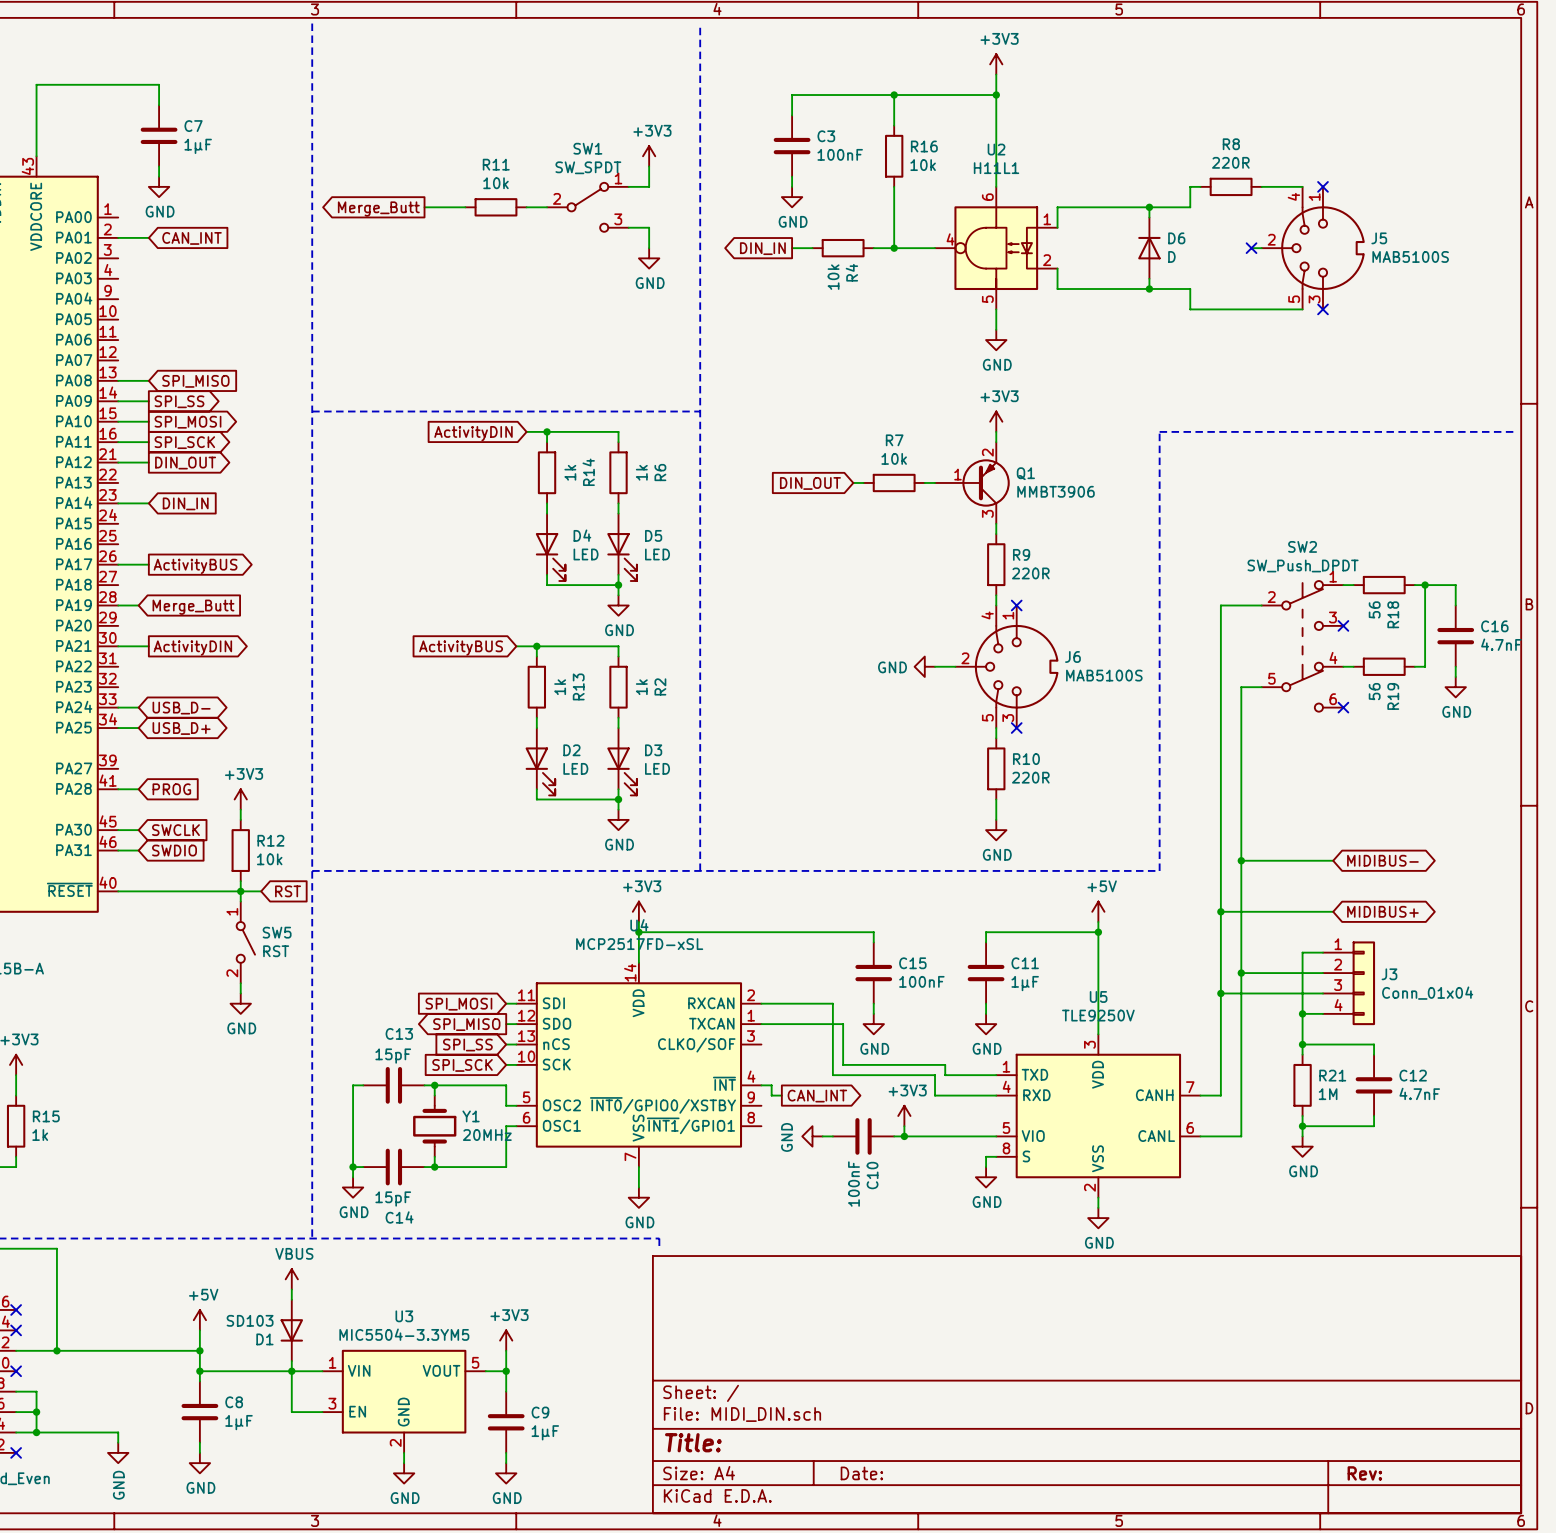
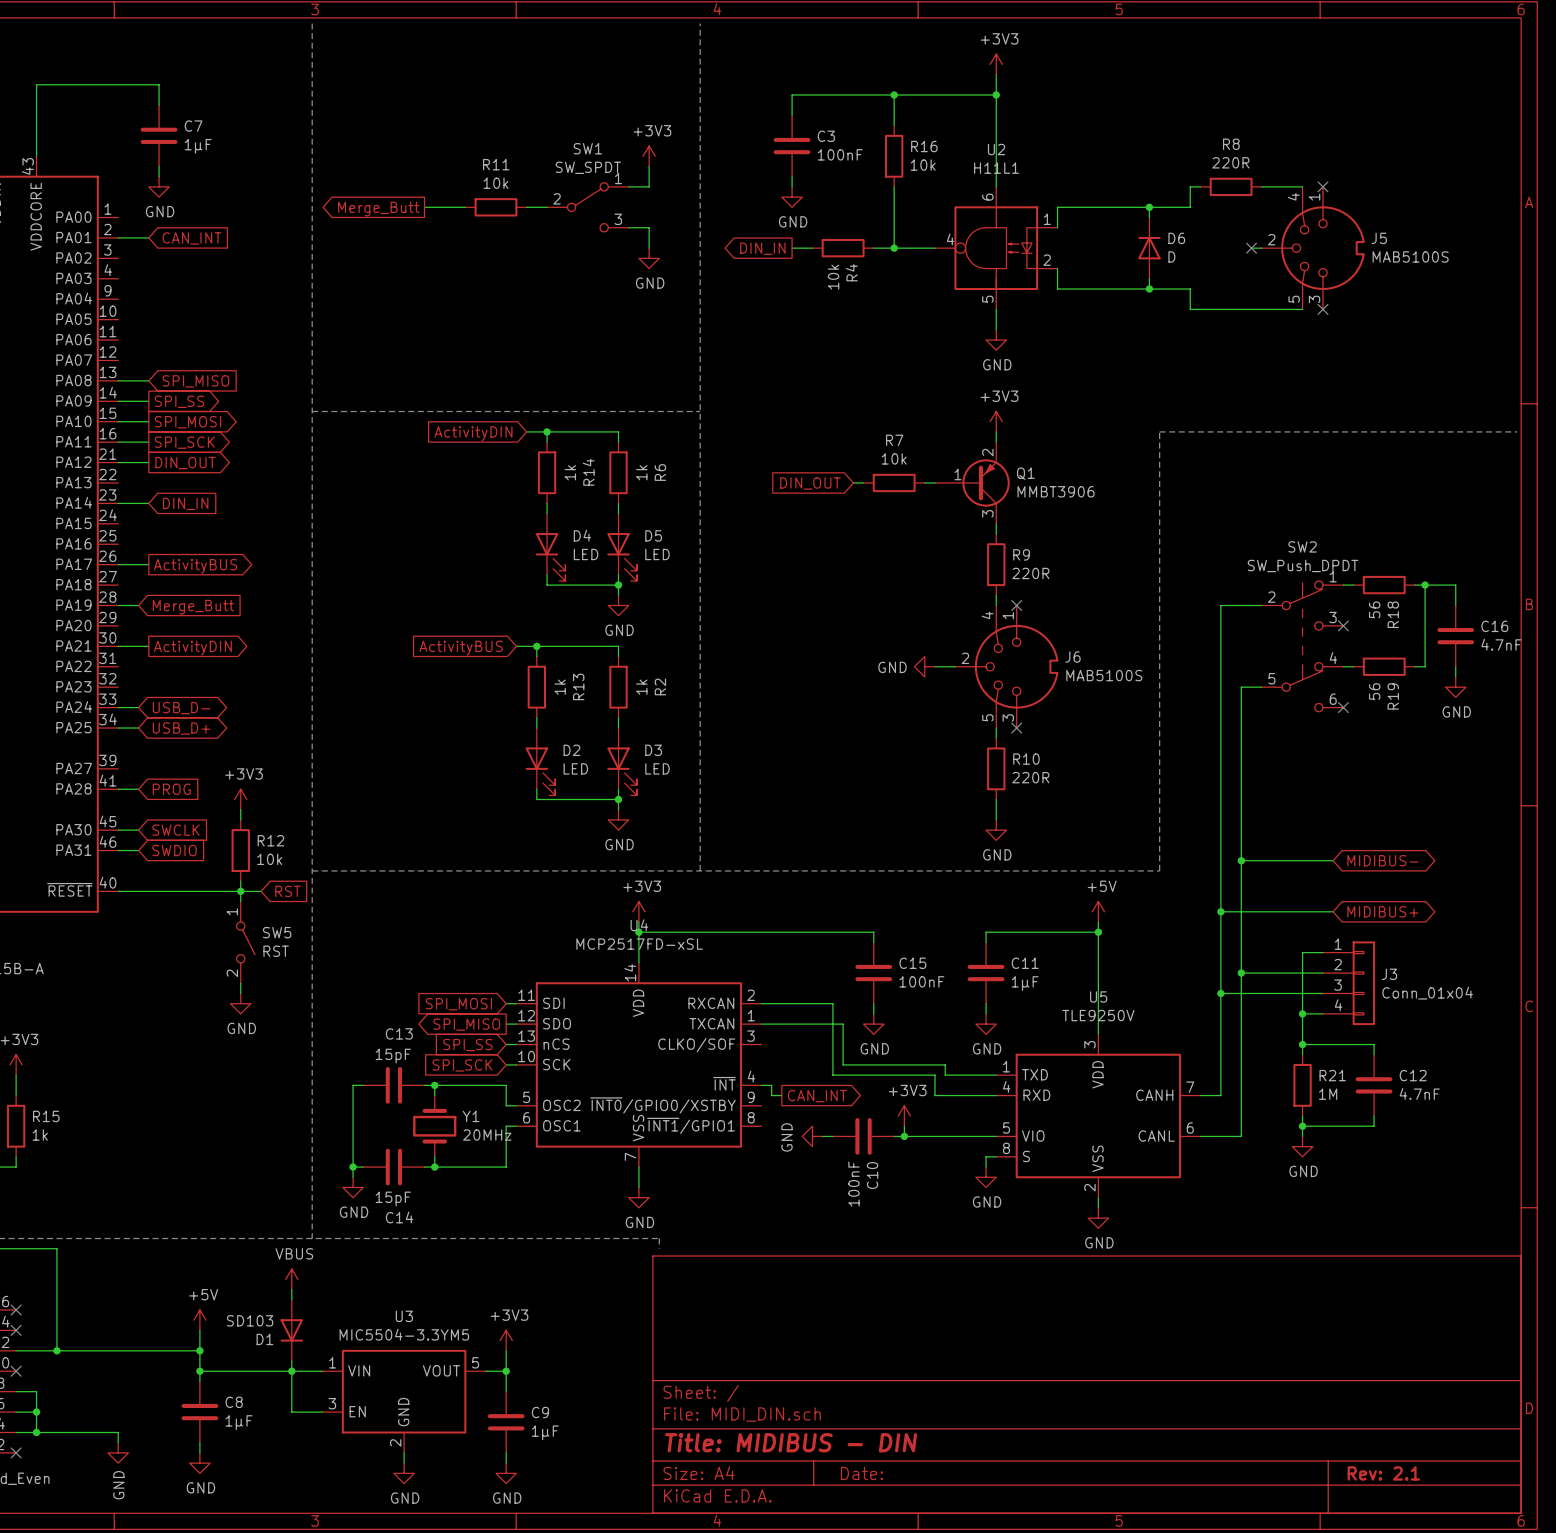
title block: Title: (693, 1442) -> Title: MIDIBUS - DIN (791, 1442)
title block: Rev: (1364, 1473) -> Rev: 2.1 (1383, 1473)

